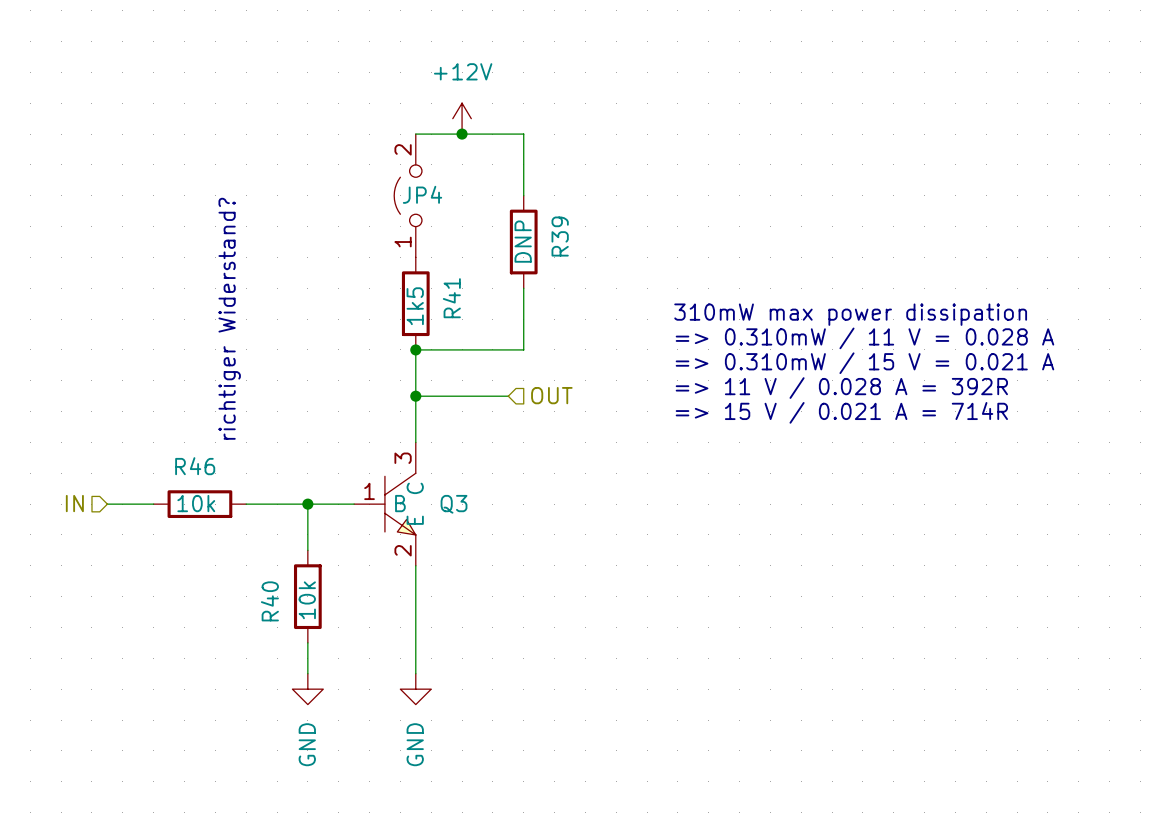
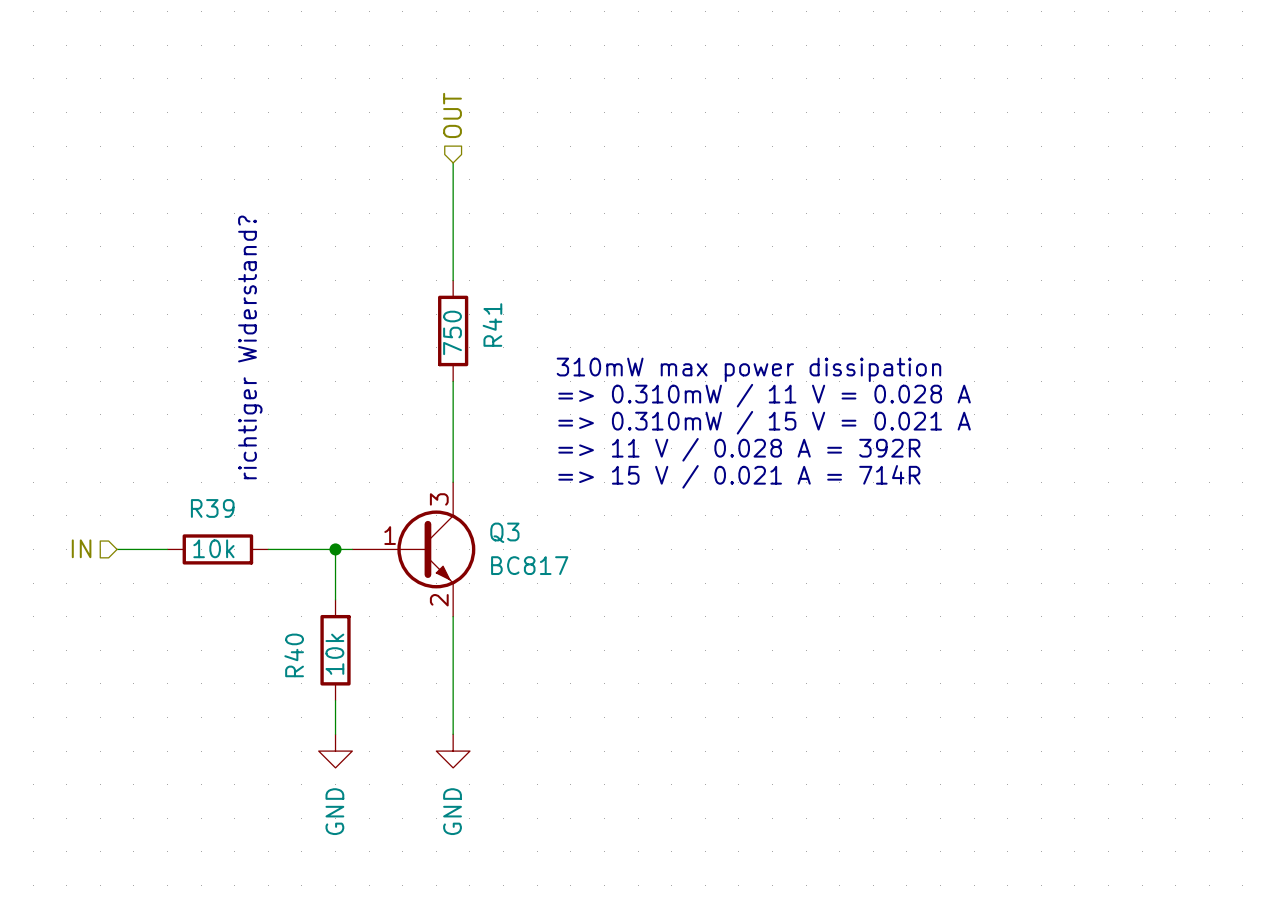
power symbol: +12V (462, 118) -> none
wire: (415, 134) (523, 134) (523, 195) -> none
junction: (462, 134) -> none
wire: none -> (453, 162) (453, 280)
JP4: (408, 195) -> none
R39: DNP (523, 242) -> none
wire: (523, 288) (523, 349) (415, 349) -> none
R41 value: 1k5 (415, 306) -> 750 (452, 332)
text position: 310mW max power dissipation (850, 314) -> 310mW max power dissipation (748, 369)
text position: => 0.310mW / 11 V = 0.028 A (864, 338) -> => 0.310mW / 11 V = 0.028 A (764, 395)
junction: (415, 349) -> none
text position: => 0.310mW / 15 V = 0.021 A (864, 363) -> => 0.310mW / 15 V = 0.021 A (764, 422)
text position: => 11 V / 0.028 A = 392R (841, 388) -> => 11 V / 0.028 A = 392R (739, 449)
hierarchical label rotation: 0° (551, 395) -> 90° counterclockwise (452, 115)
hierarchical label position: OUT (551, 395) -> OUT (452, 115)
wire: (415, 396) (508, 396) -> none
junction: (415, 396) -> none
text position: => 15 V / 0.021 A = 714R (841, 412) -> => 15 V / 0.021 A = 714R (739, 476)
Q3 symbol: [354, 442, 416, 566] -> [352, 482, 476, 617]
R46 name: R46 (195, 466) -> R39 (212, 508)
Q3 value: none -> BC817 (529, 565)

